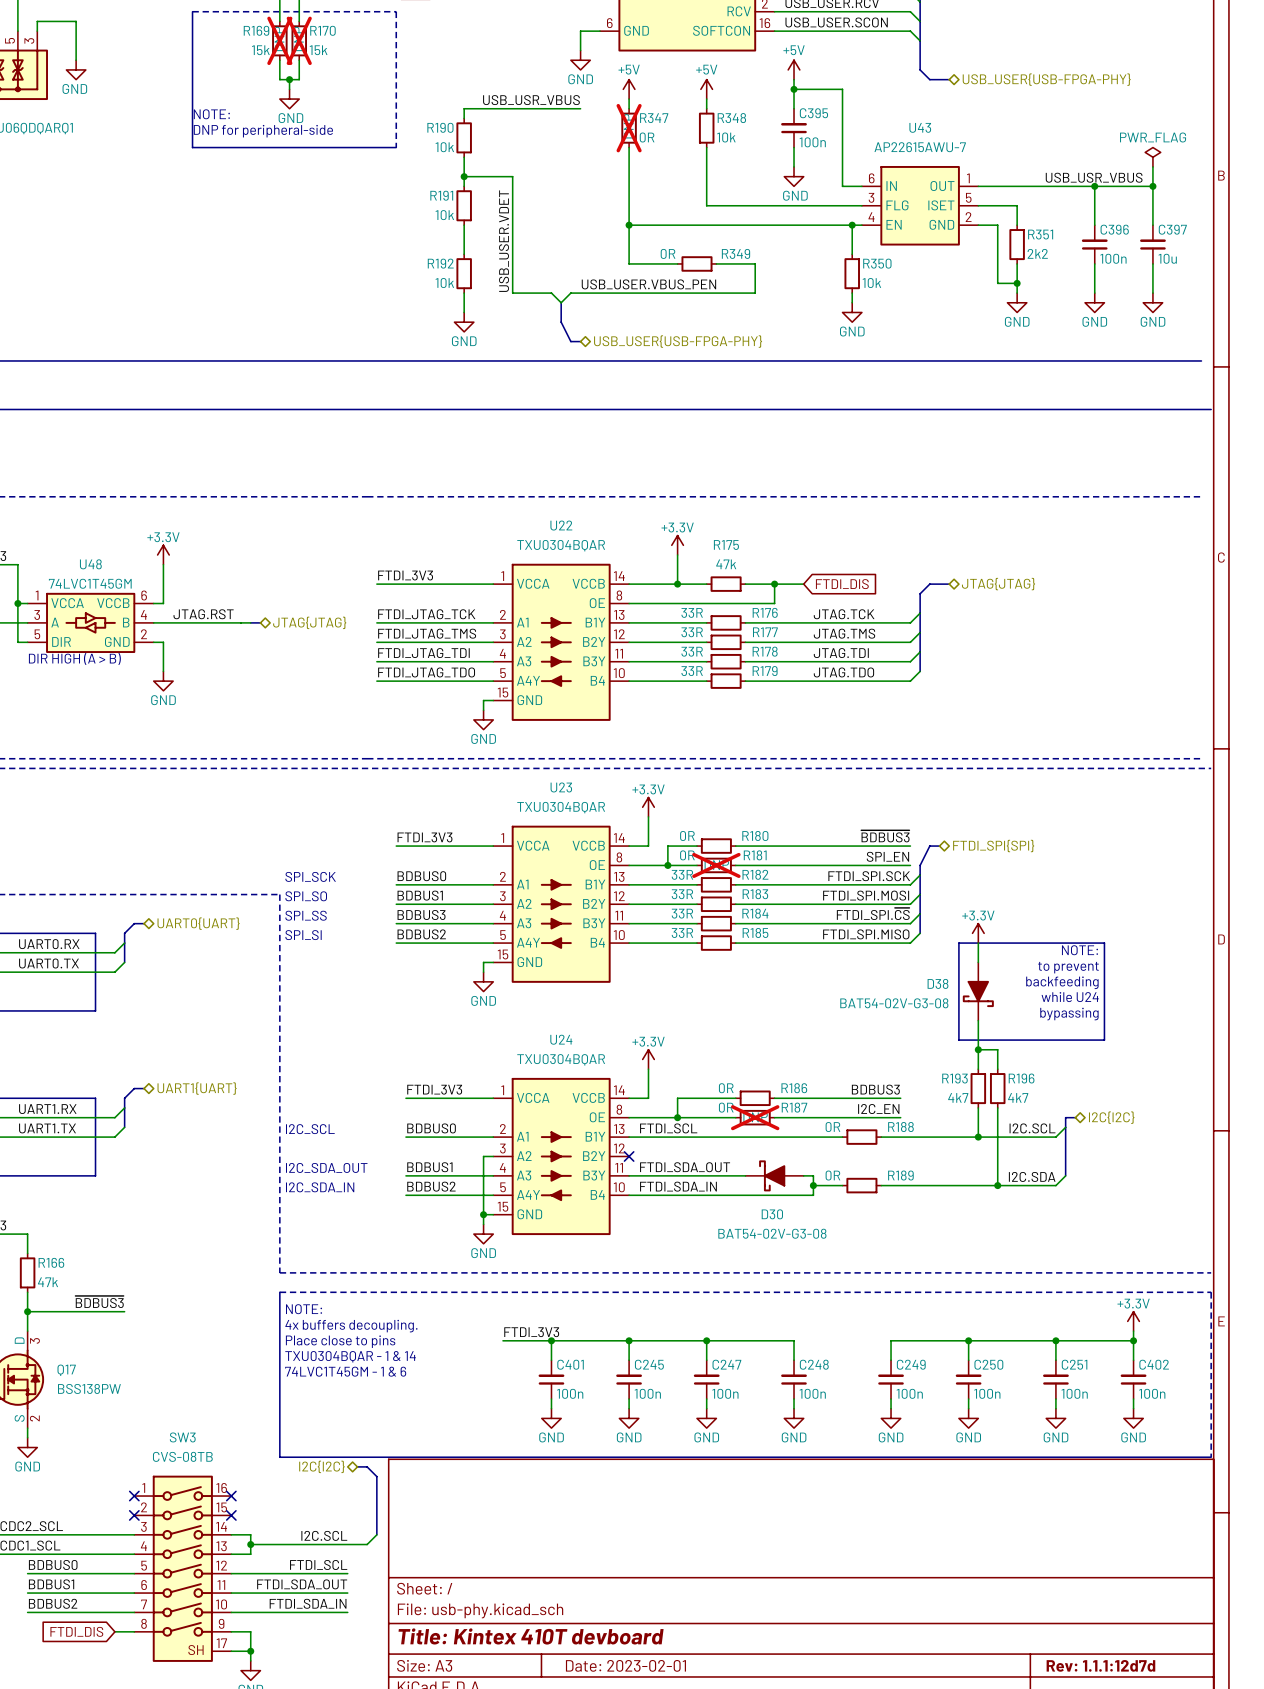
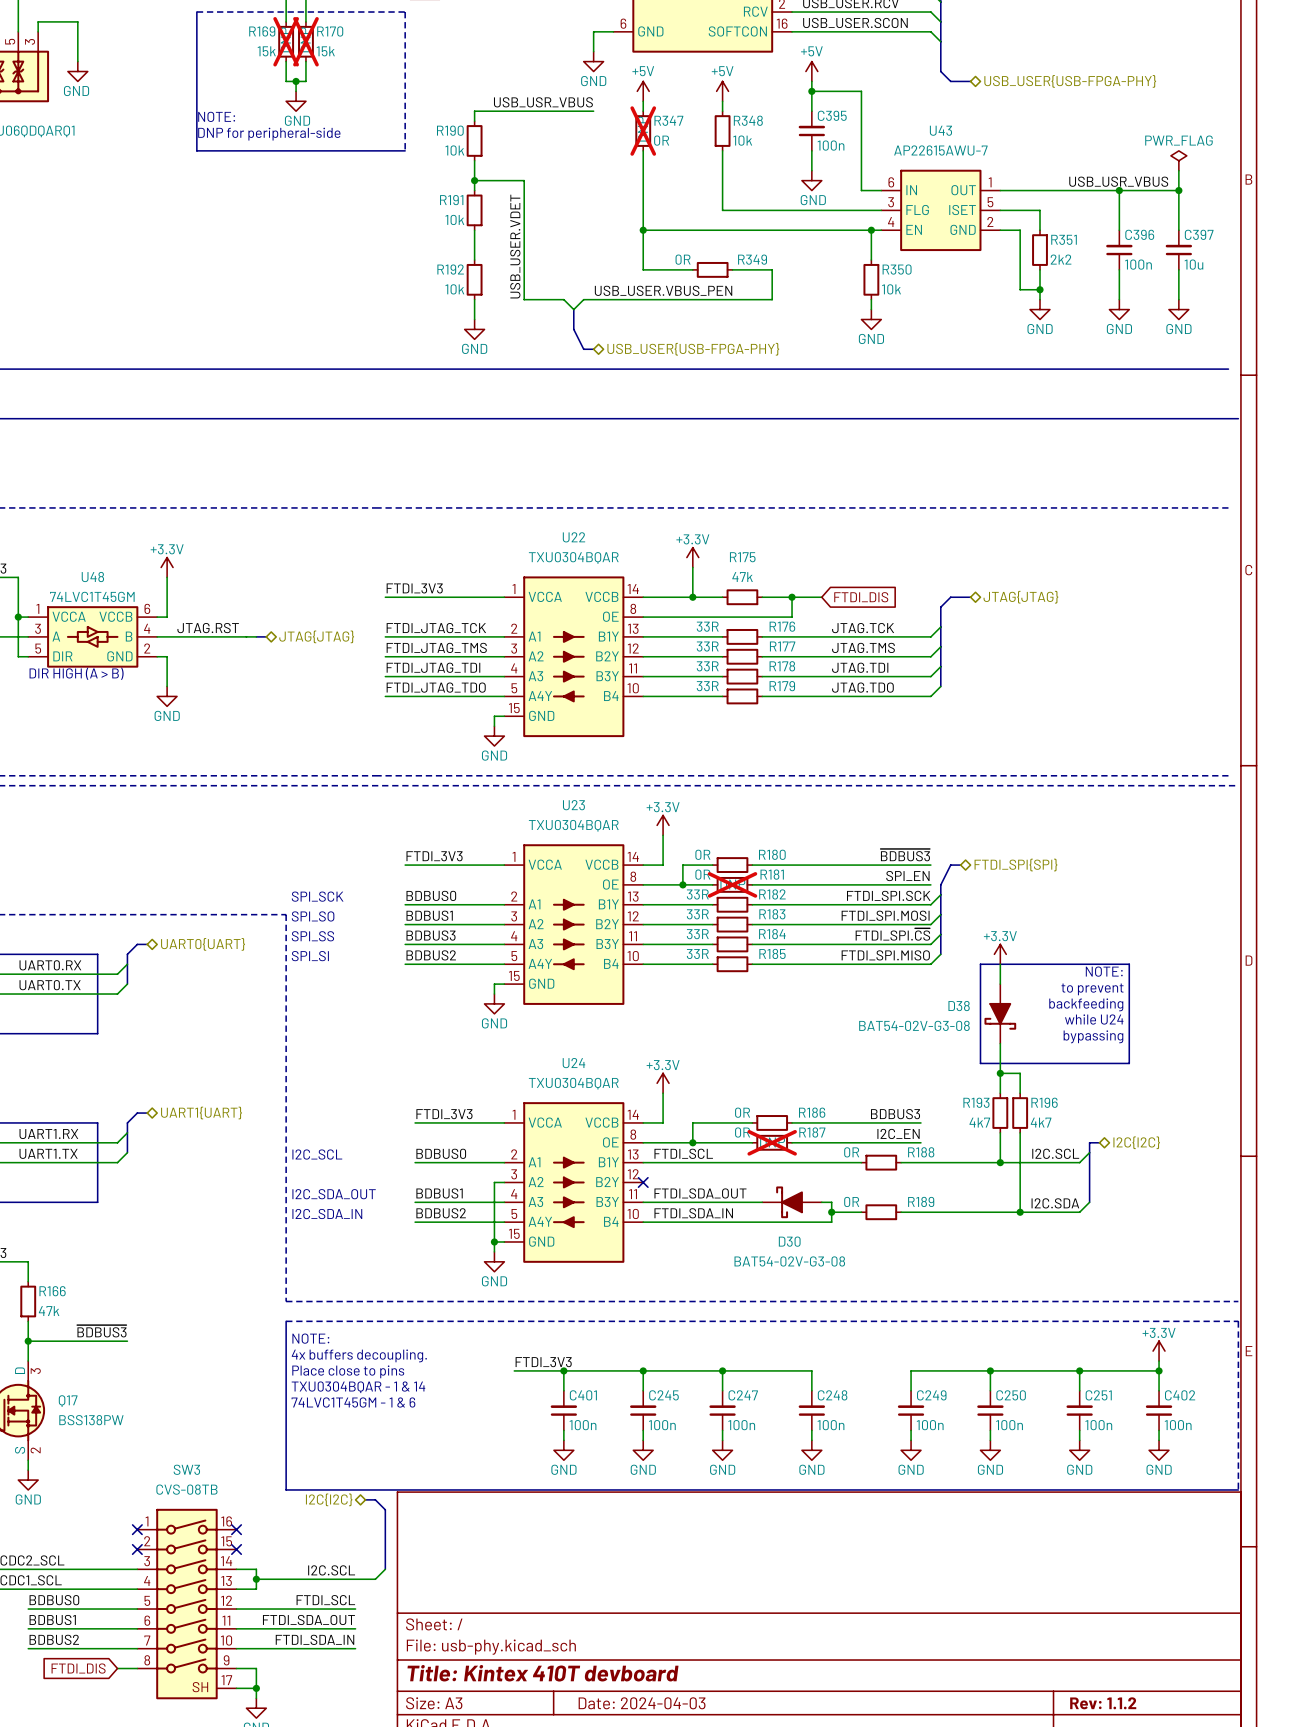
title block: Date: 2023-02-01 (625, 1665) -> Date: 2024-04-03 (642, 1703)
title block: Rev: 1.1.1:12d7d (1100, 1665) -> Rev: 1.1.2 (1103, 1703)

